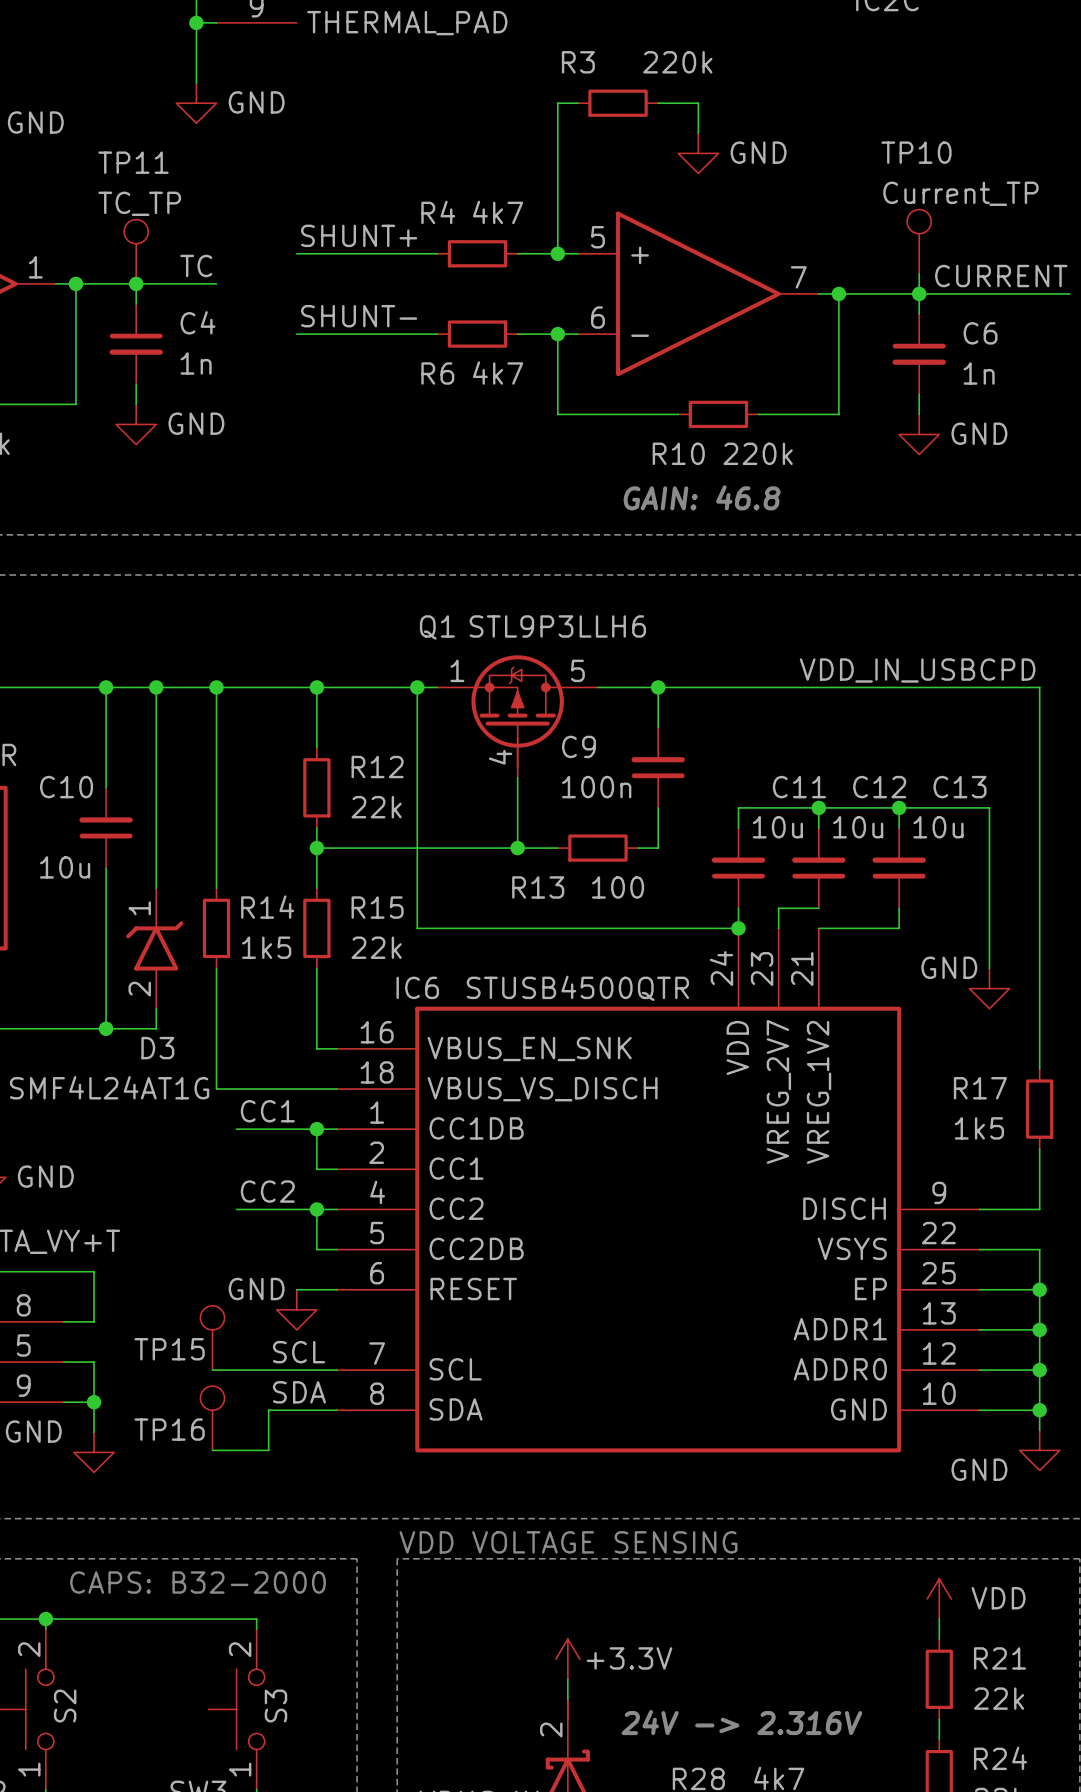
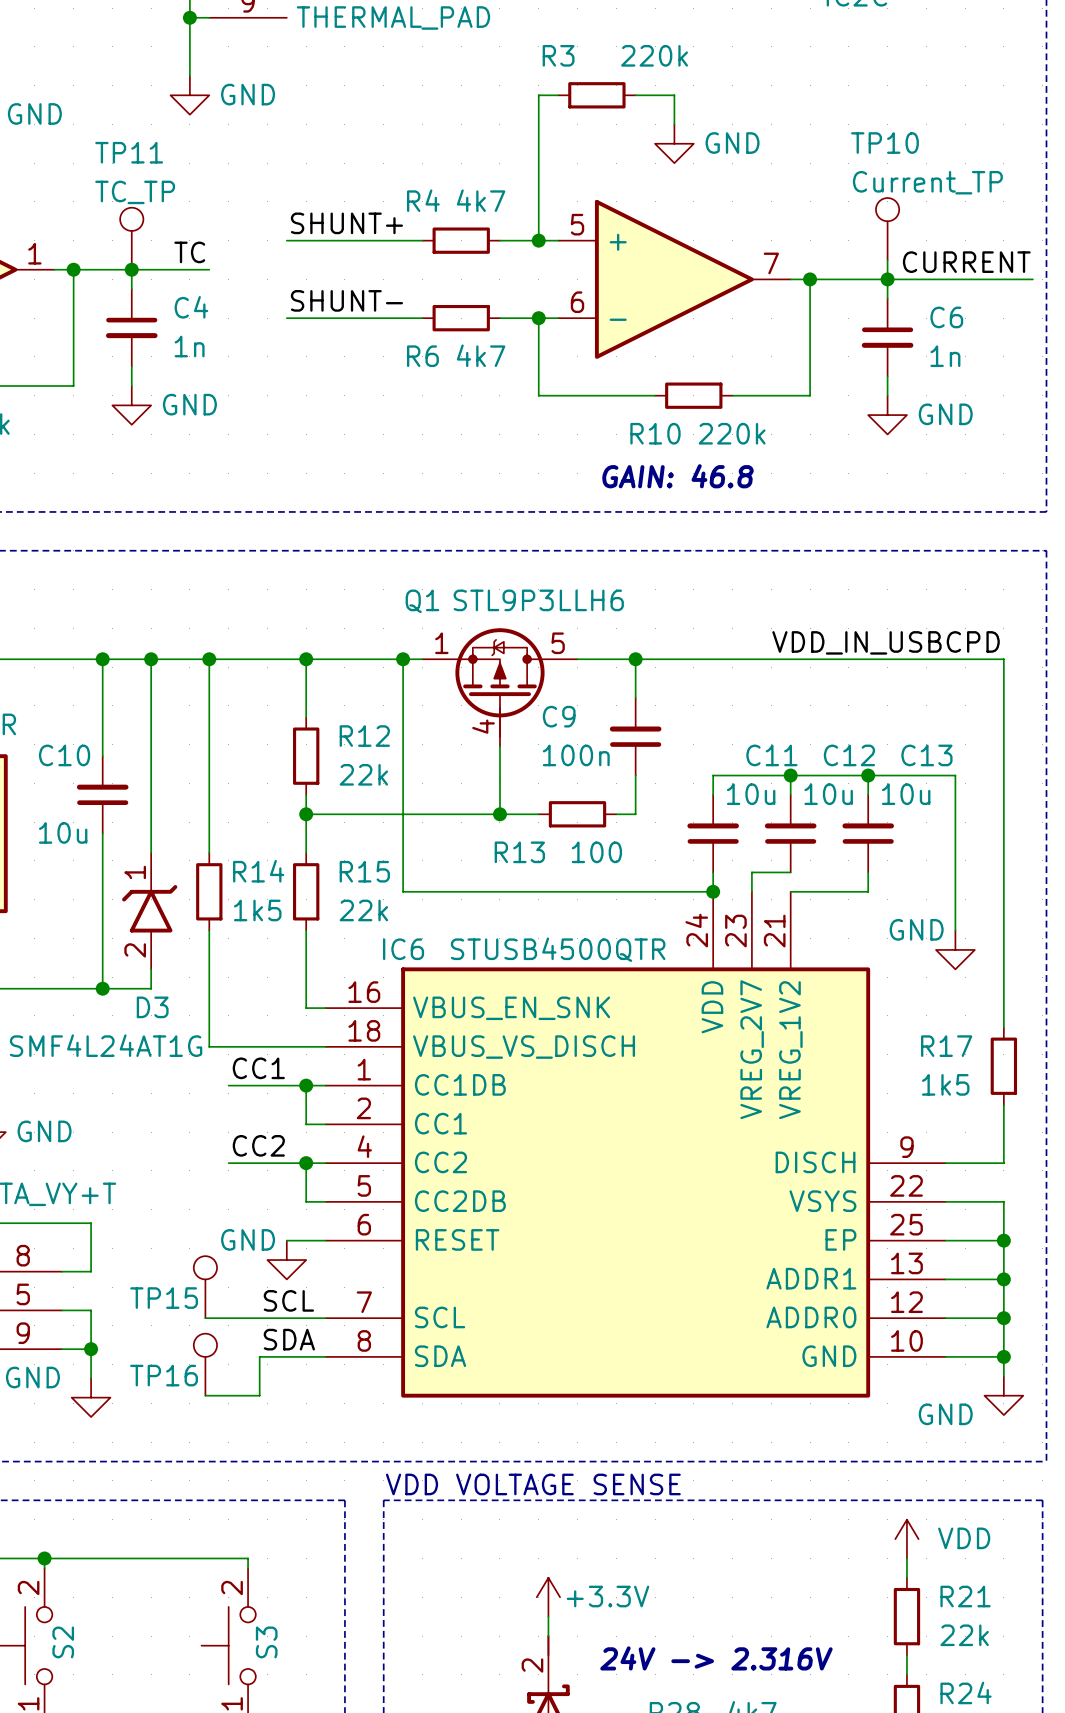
text: VDD VOLTAGE SENSING (568, 1542) -> VDD VOLTAGE SENSE (533, 1484)
text: CAPS: B32-2000 (198, 1582) -> none

